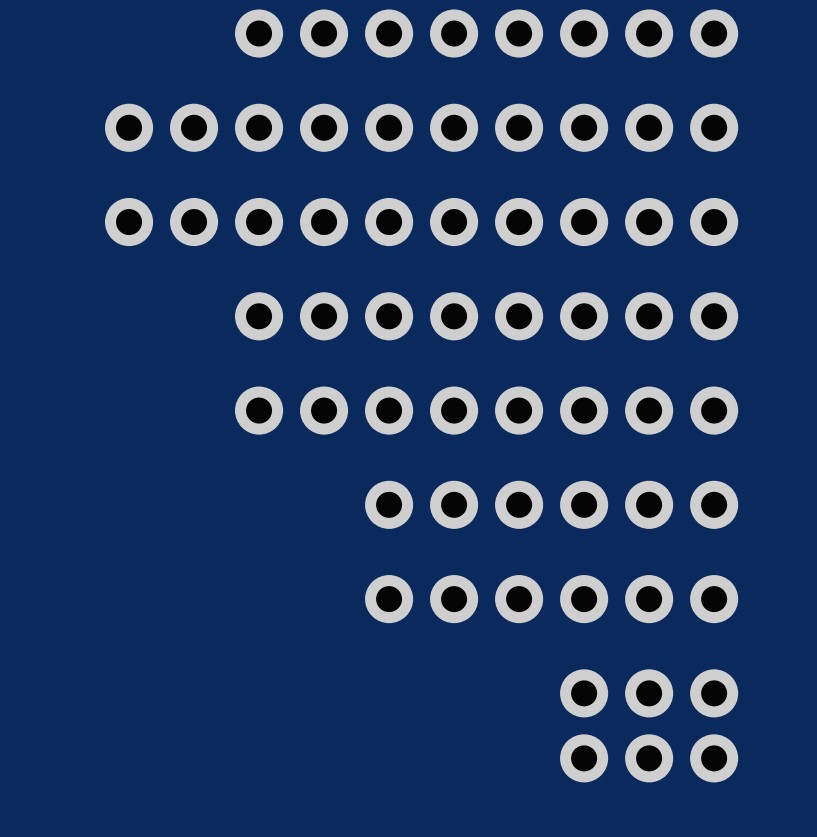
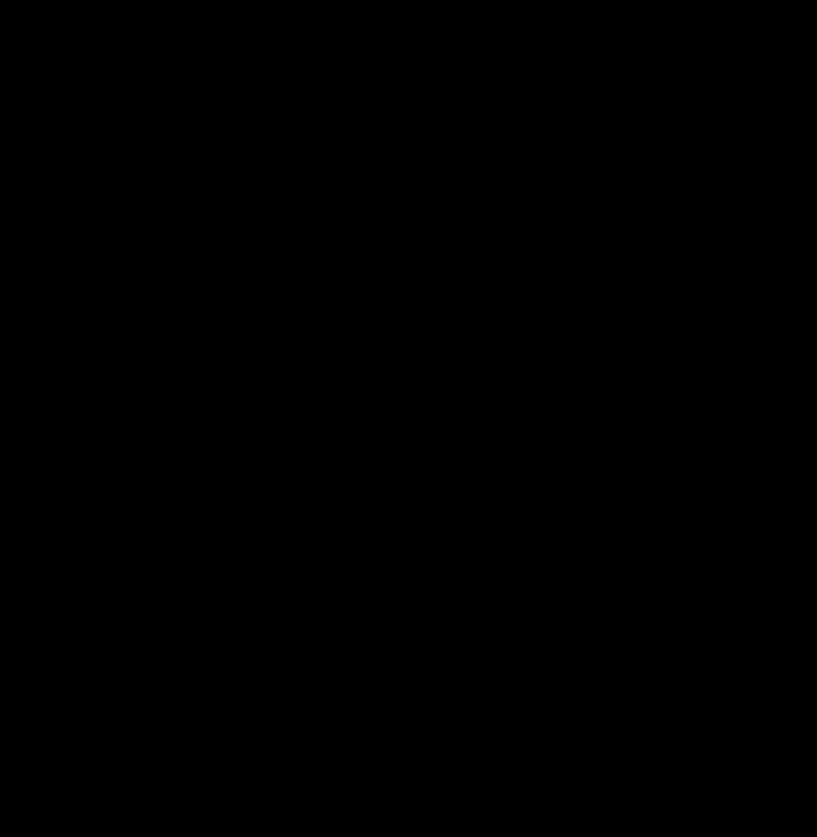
part: (486, 33) -> none
part: (421, 127) -> none
part: (421, 222) -> none
part: (486, 316) -> none
part: (486, 410) -> none
part: (551, 504) -> none
part: (551, 599) -> none
part: (649, 725) -> none

